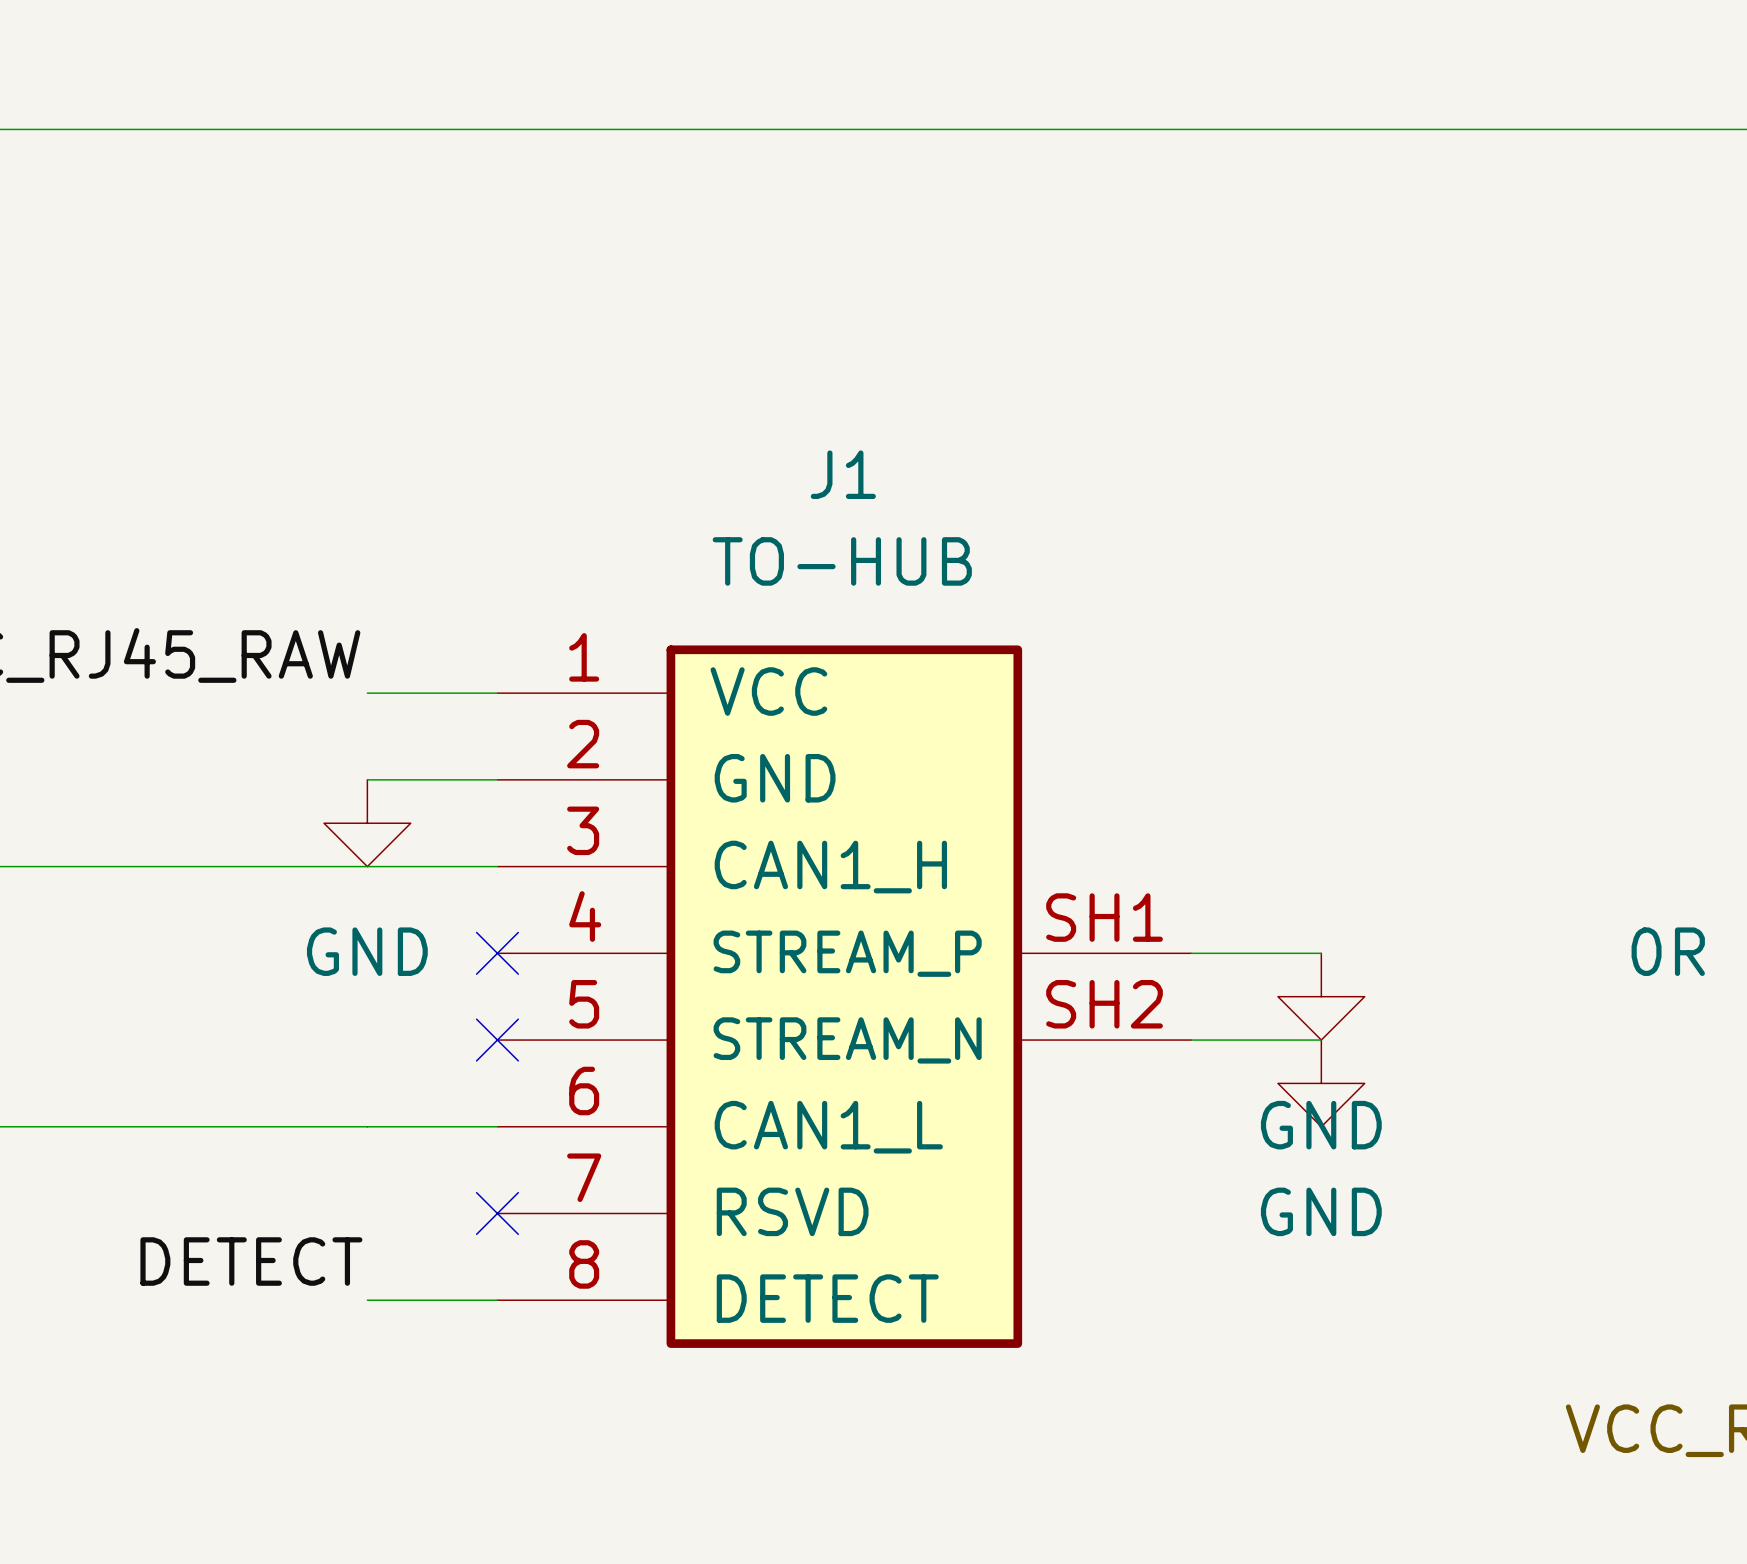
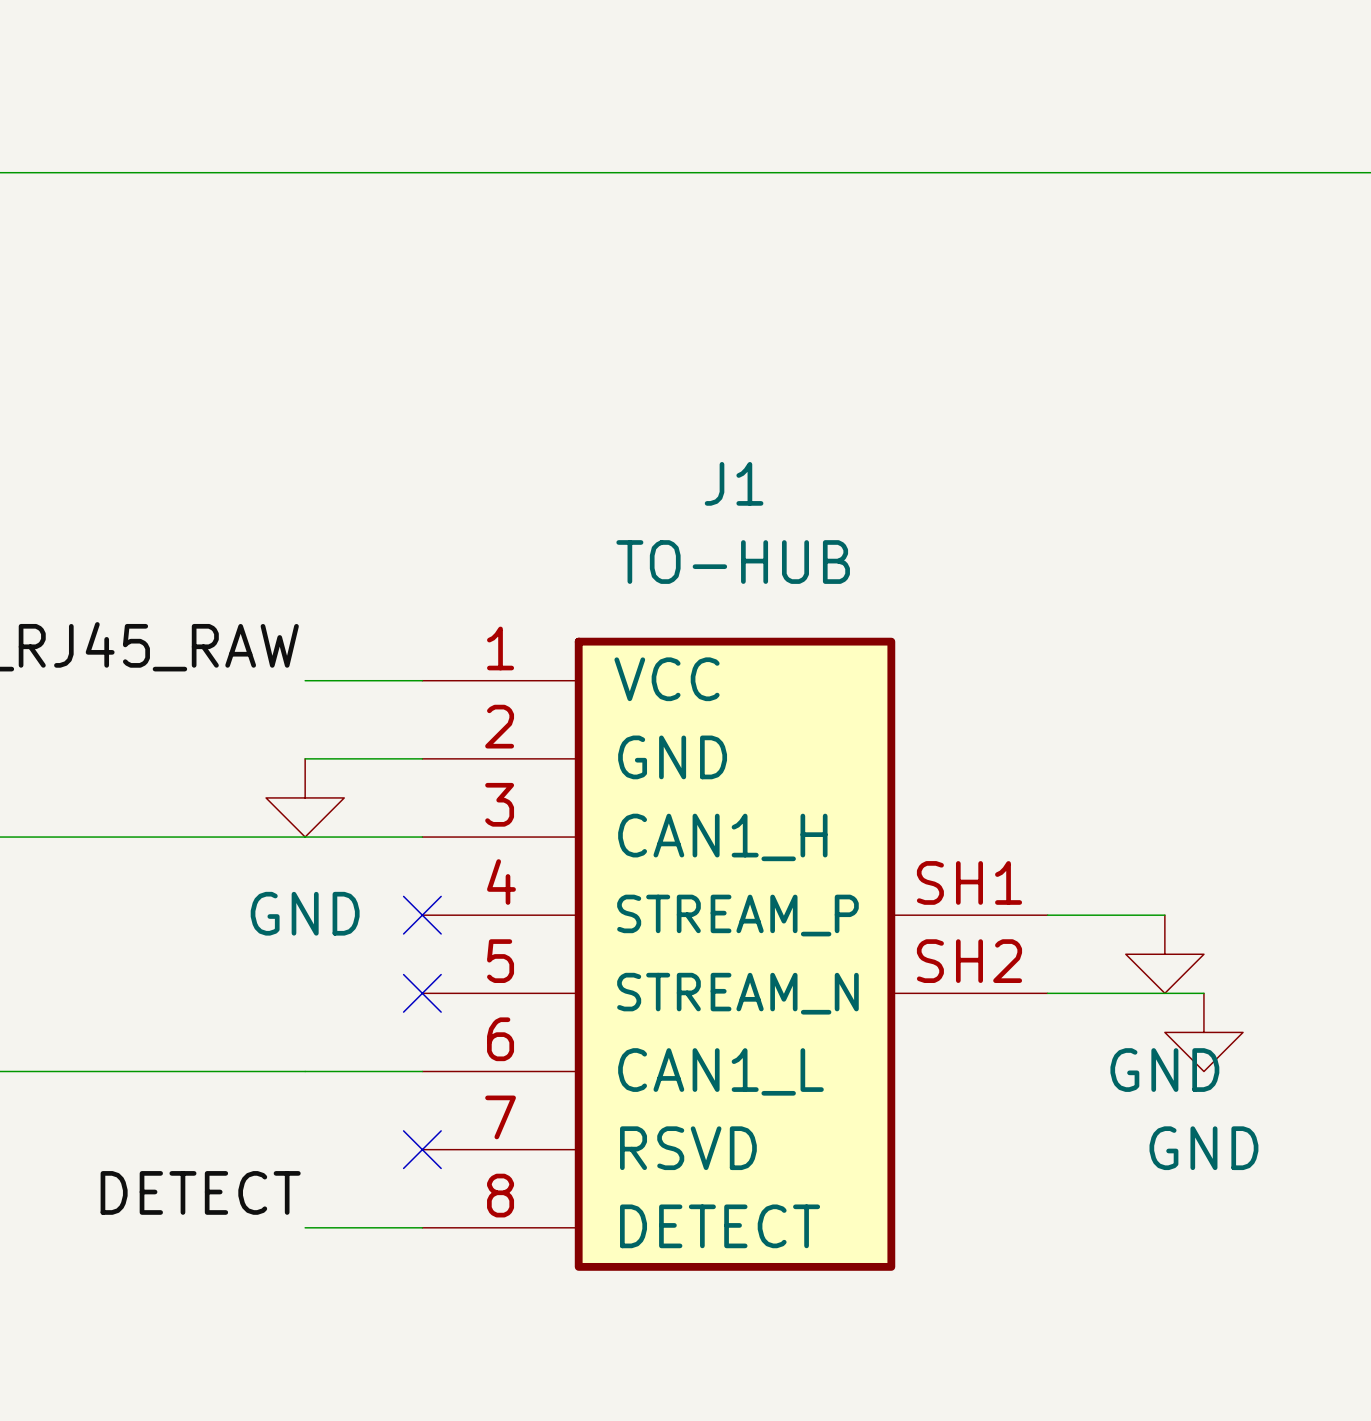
wire: none -> (1164, 993) (1203, 993)
power symbol position: GND (1321, 1083) -> GND (1203, 1032)

